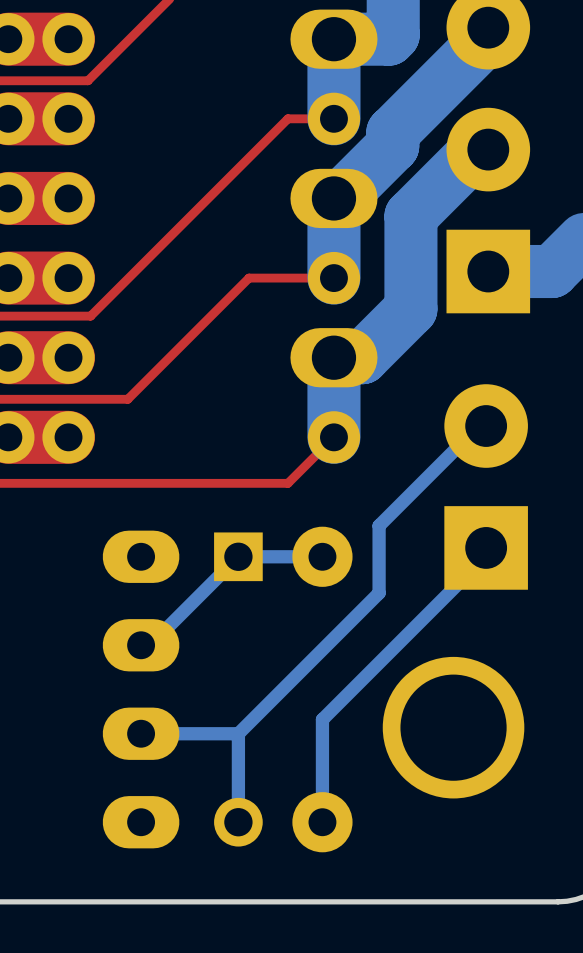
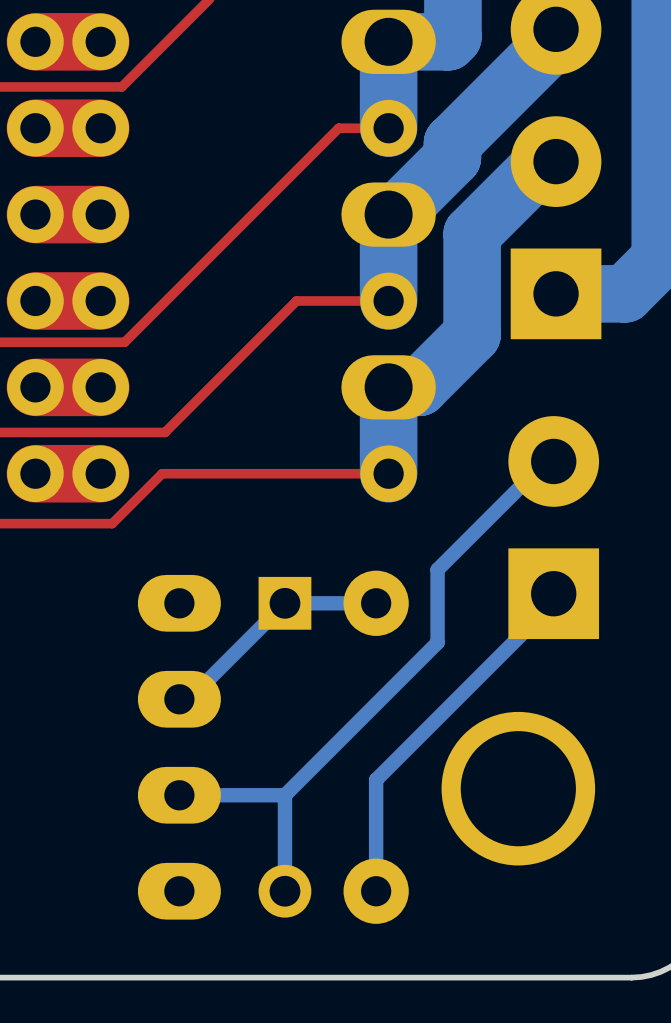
top track: (333, 437) (287, 483) (79, 483) -> (388, 473) (162, 473) (112, 523)

